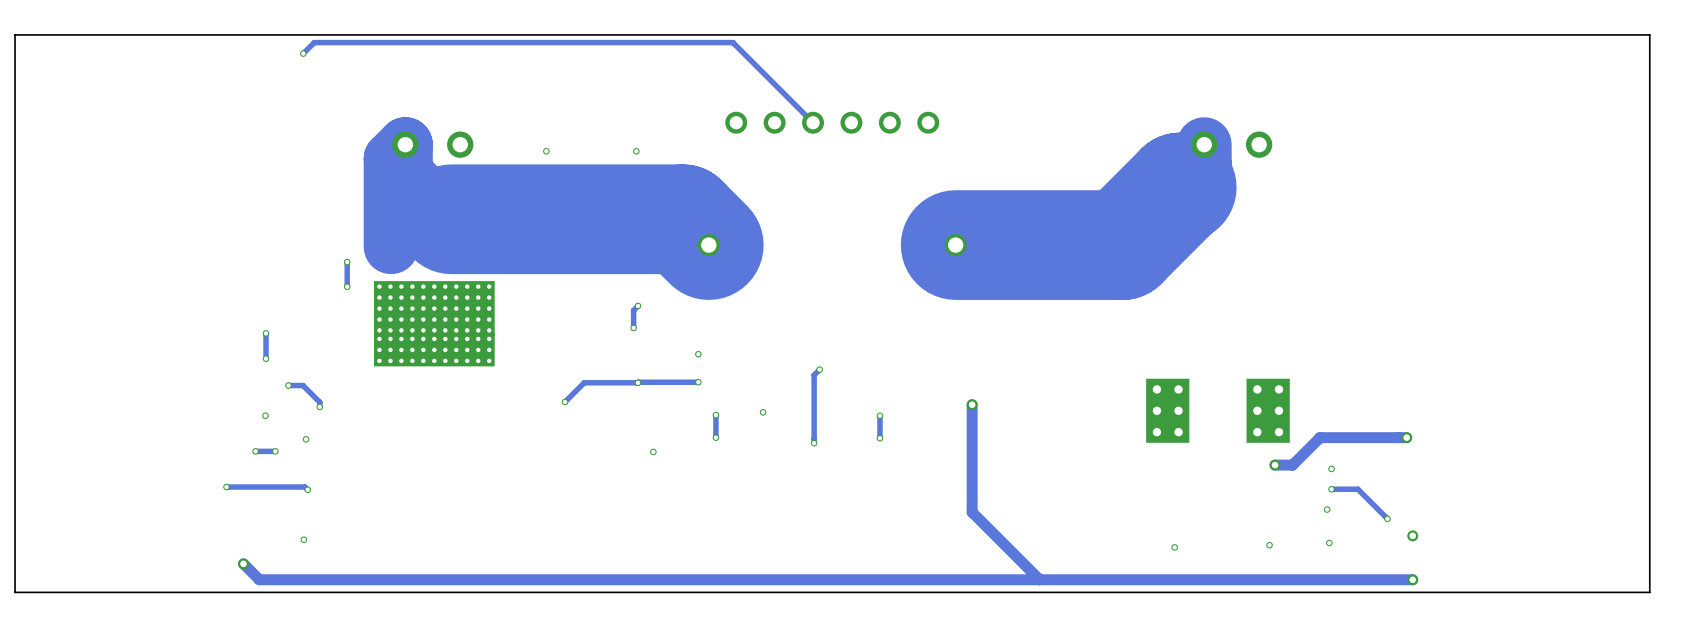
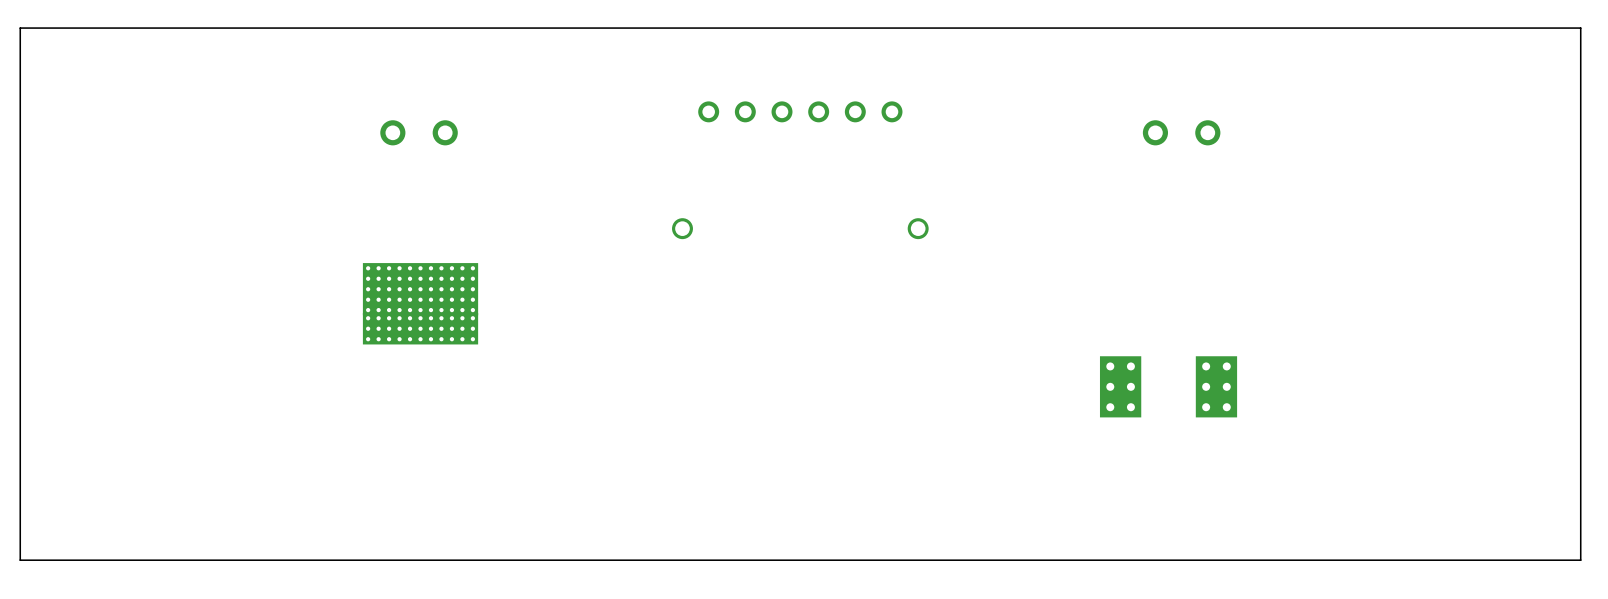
track: (303, 53) (314, 42) (732, 42) (813, 122) -> none
via: (303, 53) -> none
track: (1204, 144) (1204, 164) (1122, 245) (955, 245) -> none
via: (546, 151) -> none
via: (636, 151) -> none
track: (708, 245) (683, 219) (451, 219) (405, 173) (405, 144) (391, 158) (391, 246) -> none
track: (347, 262) (347, 286) -> none
via: (347, 262) -> none
via: (347, 286) -> none
track: (638, 305) (633, 310) (633, 327) -> none
via: (638, 305) -> none
via: (633, 327) -> none
track: (266, 333) (266, 358) -> none
via: (266, 333) -> none
via: (698, 354) -> none
via: (266, 358) -> none
track: (819, 369) (814, 375) (814, 443) -> none
via: (819, 369) -> none
via: (638, 382) -> none
track: (698, 382) (584, 382) (565, 401) -> none
via: (698, 382) -> none
track: (288, 385) (303, 385) (319, 402) (319, 406) -> none
via: (288, 385) -> none
via: (565, 401) -> none
track: (972, 404) (972, 512) (1039, 579) -> none
via: (972, 404) -> none
via: (319, 406) -> none
via: (763, 412) -> none
via: (265, 415) -> none
track: (715, 415) (715, 437) -> none
via: (715, 415) -> none
track: (879, 415) (879, 438) -> none
via: (879, 415) -> none
via: (715, 437) -> none
track: (1406, 437) (1320, 437) (1292, 465) (1275, 465) -> none
via: (1406, 437) -> none
via: (879, 438) -> none
via: (306, 439) -> none
via: (814, 443) -> none
via: (255, 451) -> none
track: (275, 451) (255, 451) -> none
via: (275, 451) -> none
via: (653, 451) -> none
via: (1275, 465) -> none
via: (1331, 468) -> none
track: (226, 487) (304, 487) (307, 489) -> none
via: (226, 487) -> none
via: (307, 489) -> none
track: (1331, 489) (1357, 489) (1387, 518) -> none
via: (1331, 489) -> none
via: (1327, 509) -> none
via: (1387, 518) -> none
via: (1412, 535) -> none
via: (303, 539) -> none
via: (1329, 543) -> none
via: (1269, 545) -> none
via: (1174, 547) -> none
track: (243, 563) (259, 579) (1412, 579) -> none
via: (243, 563) -> none
via: (1412, 579) -> none

